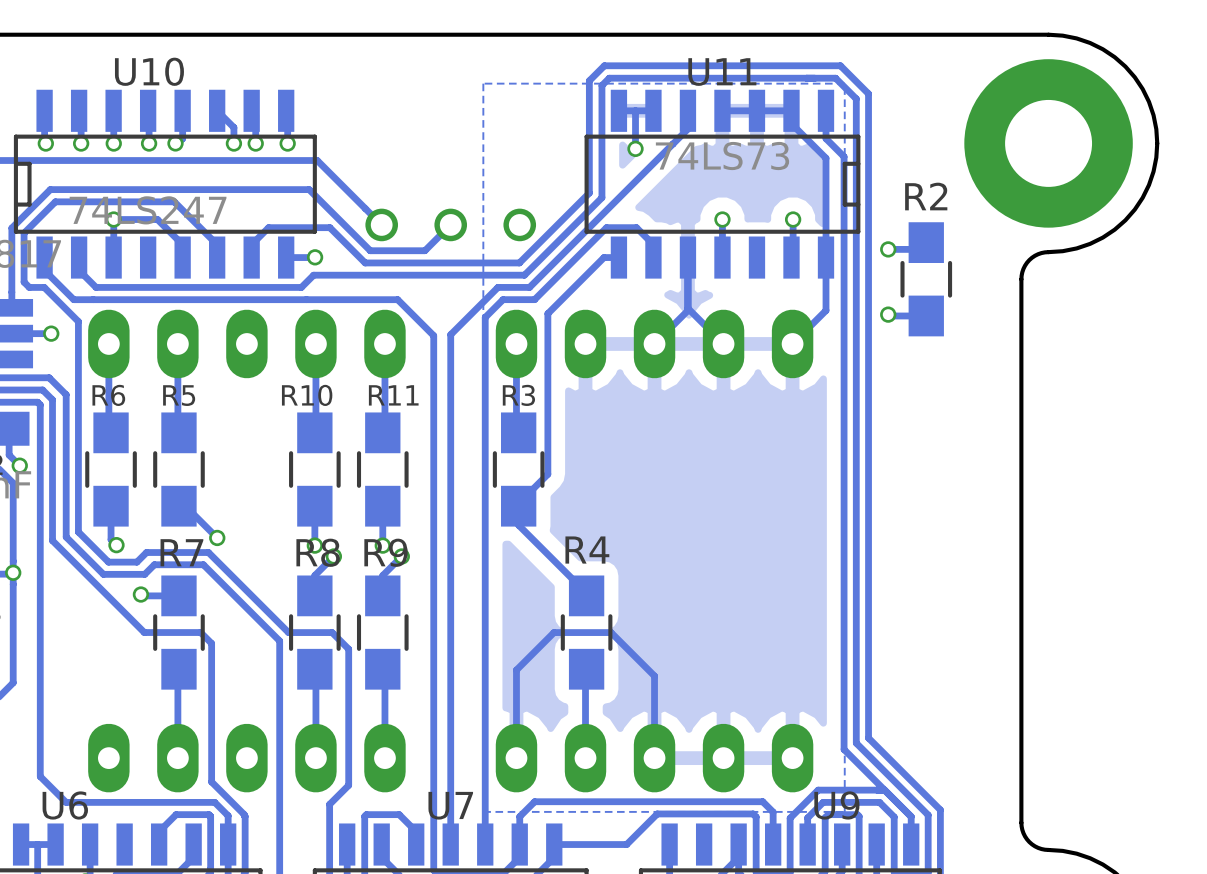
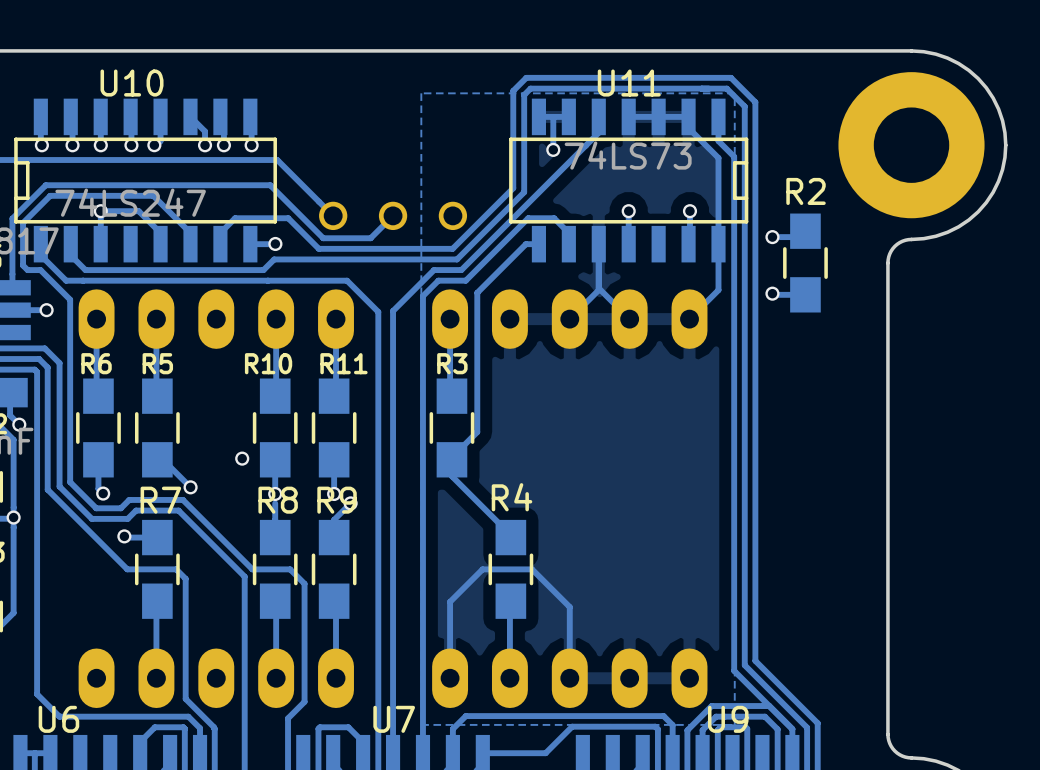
track: (333, 556) (314, 575) -> (275, 503) (275, 519)
via position: (333, 556) -> (242, 458)

